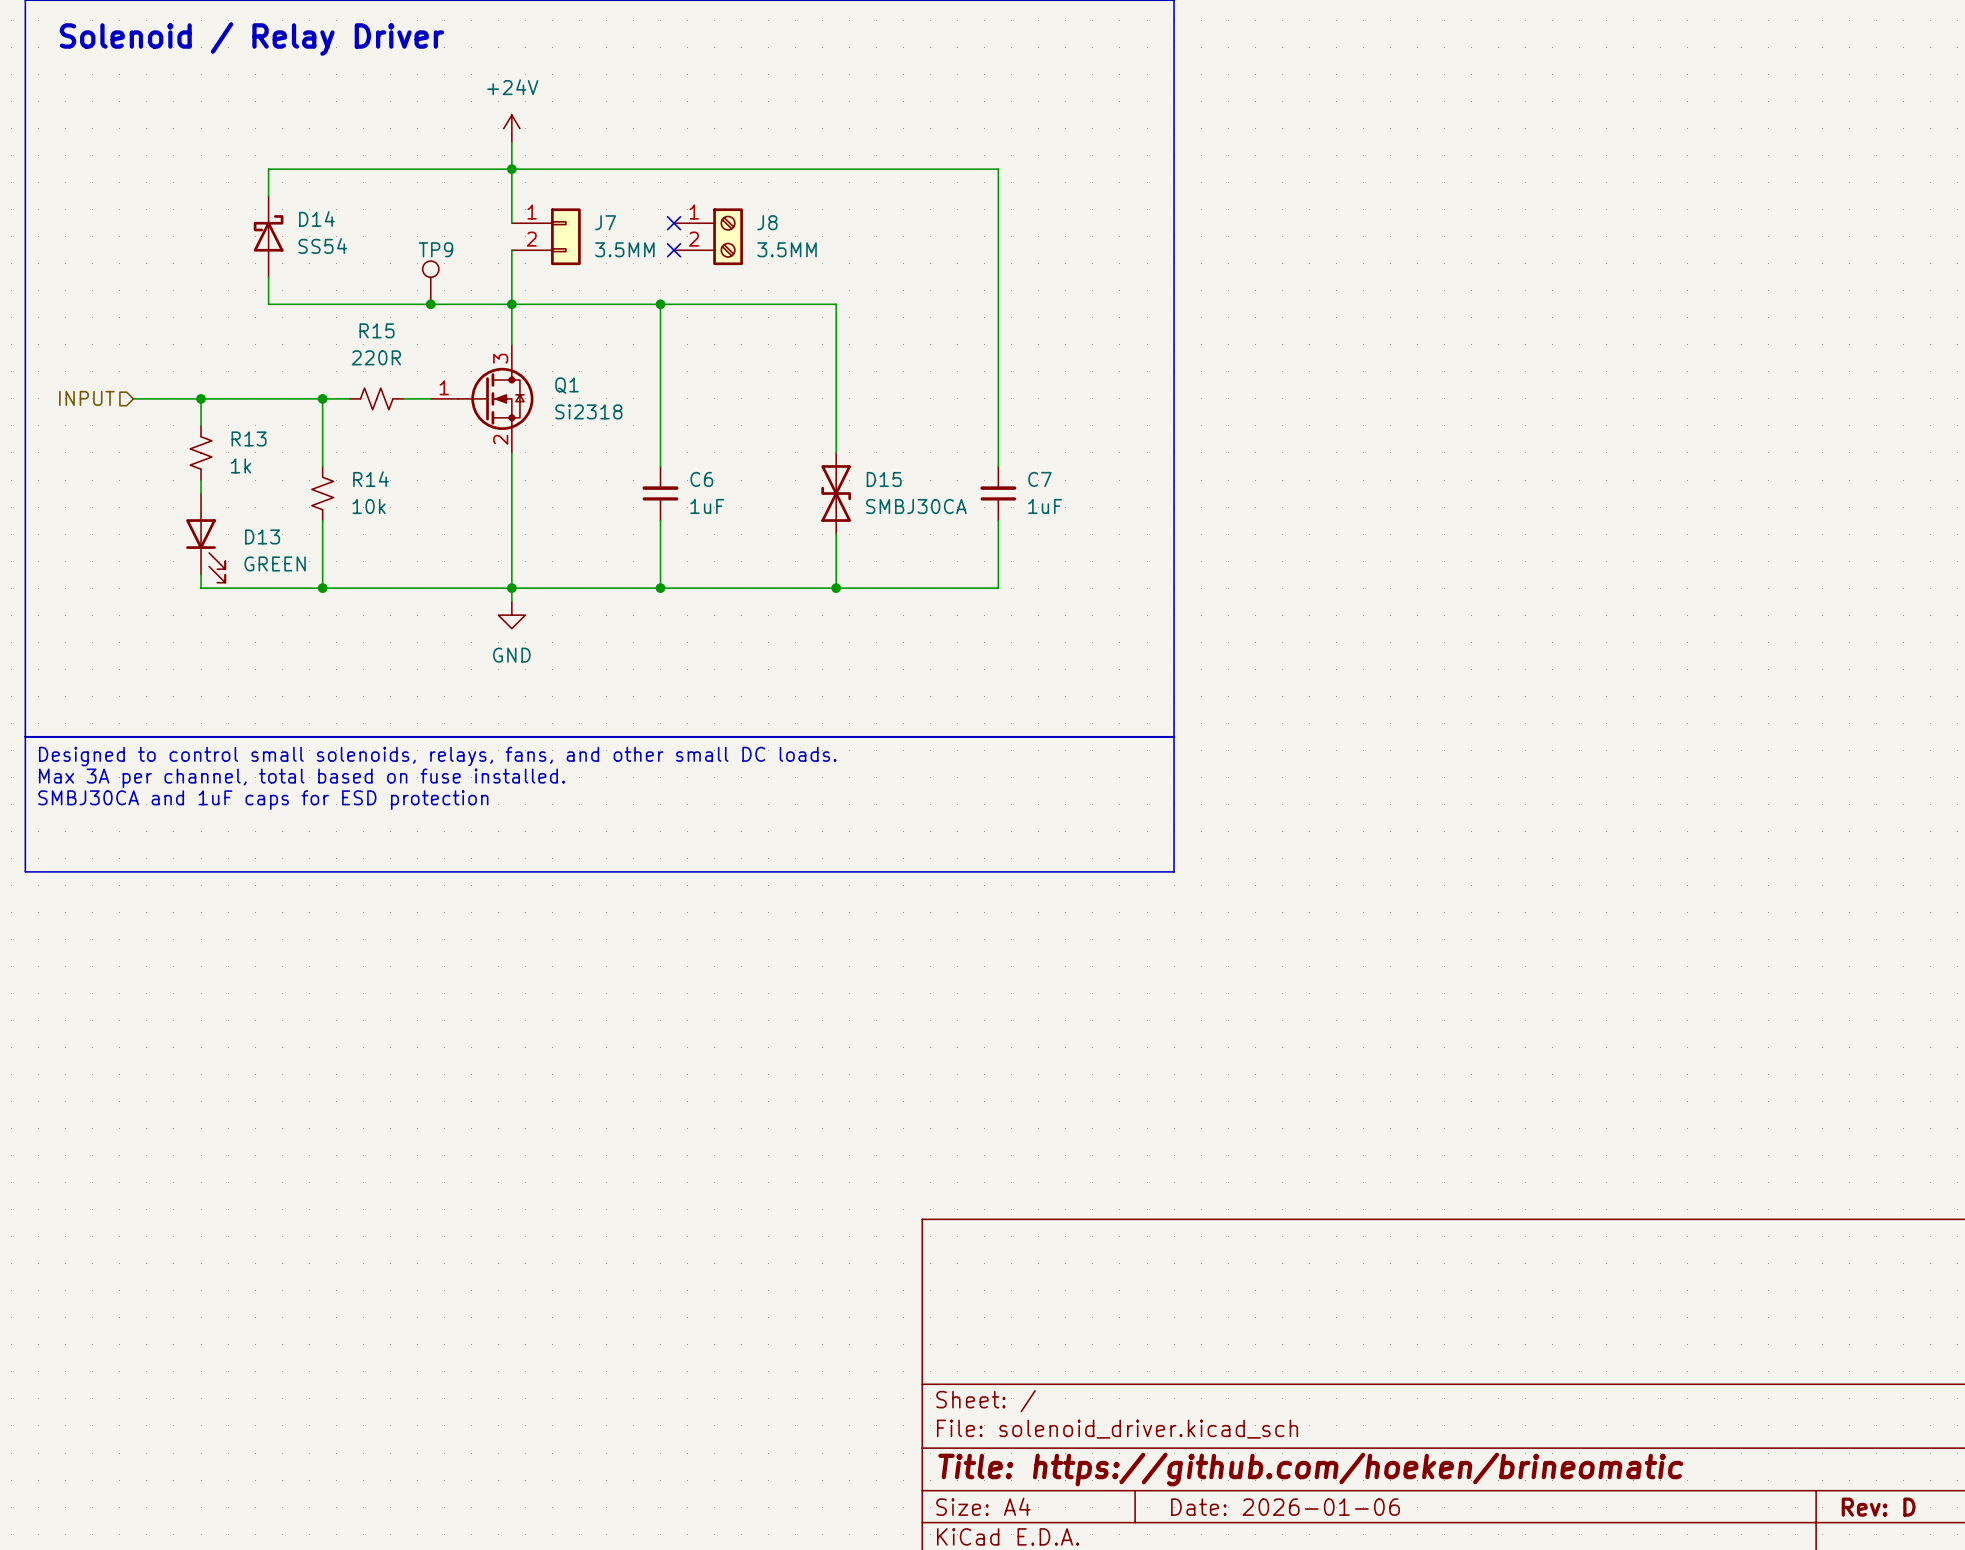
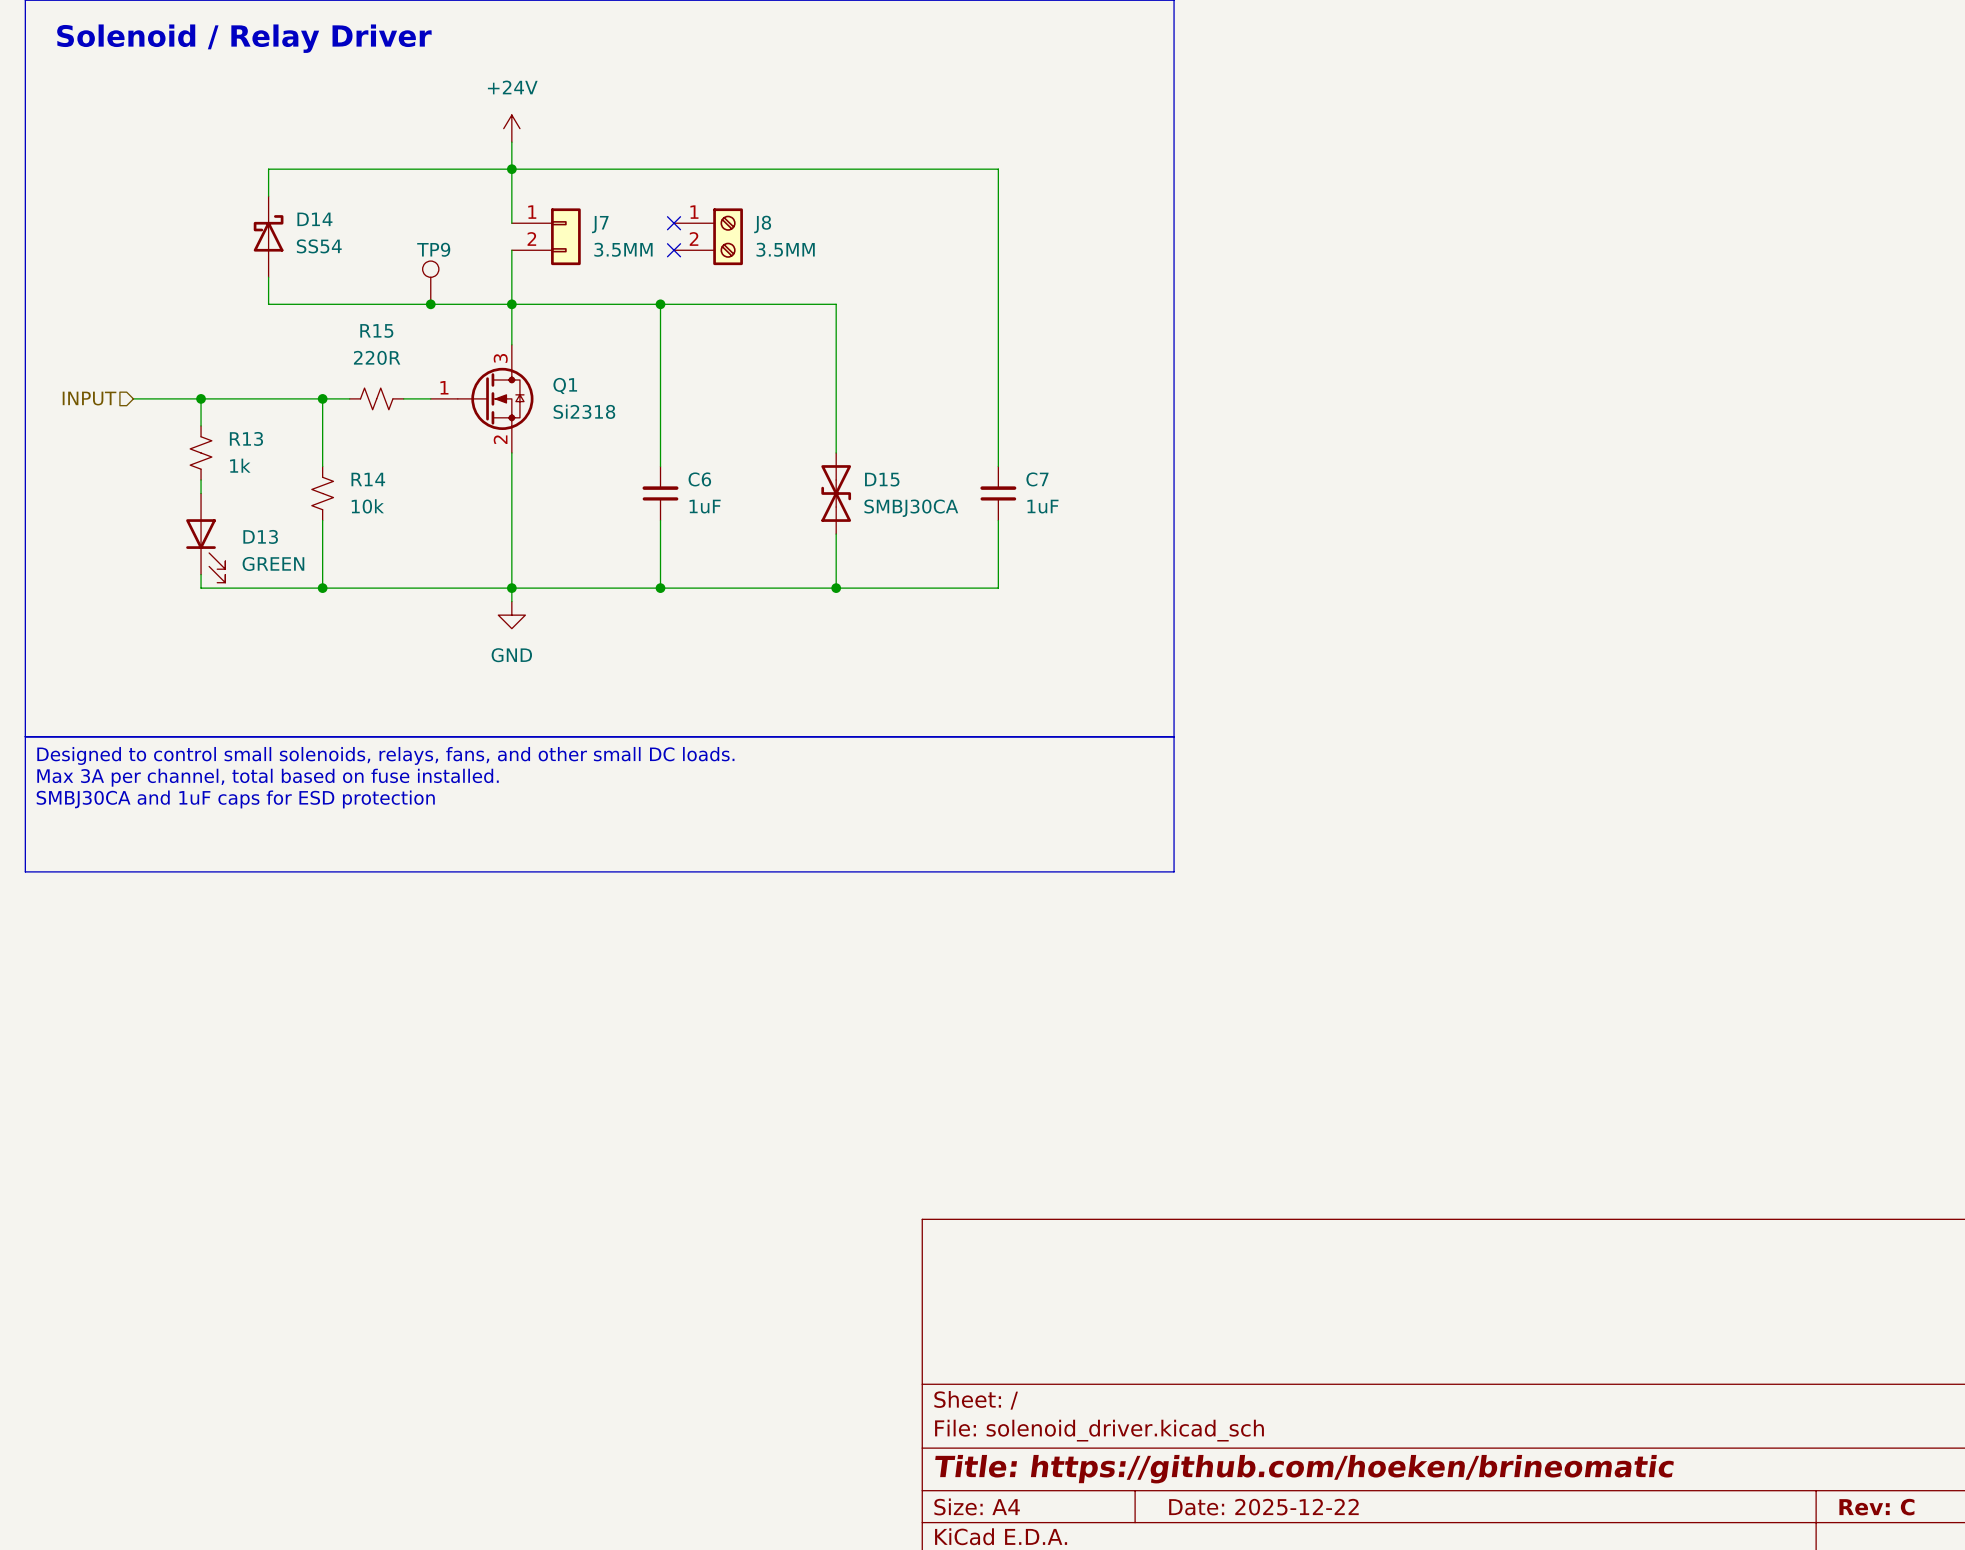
title block: Date: 2026-01-06 (1285, 1507) -> Date: 2025-12-22 (1263, 1507)
title block: Rev: D (1878, 1507) -> Rev: C (1876, 1507)

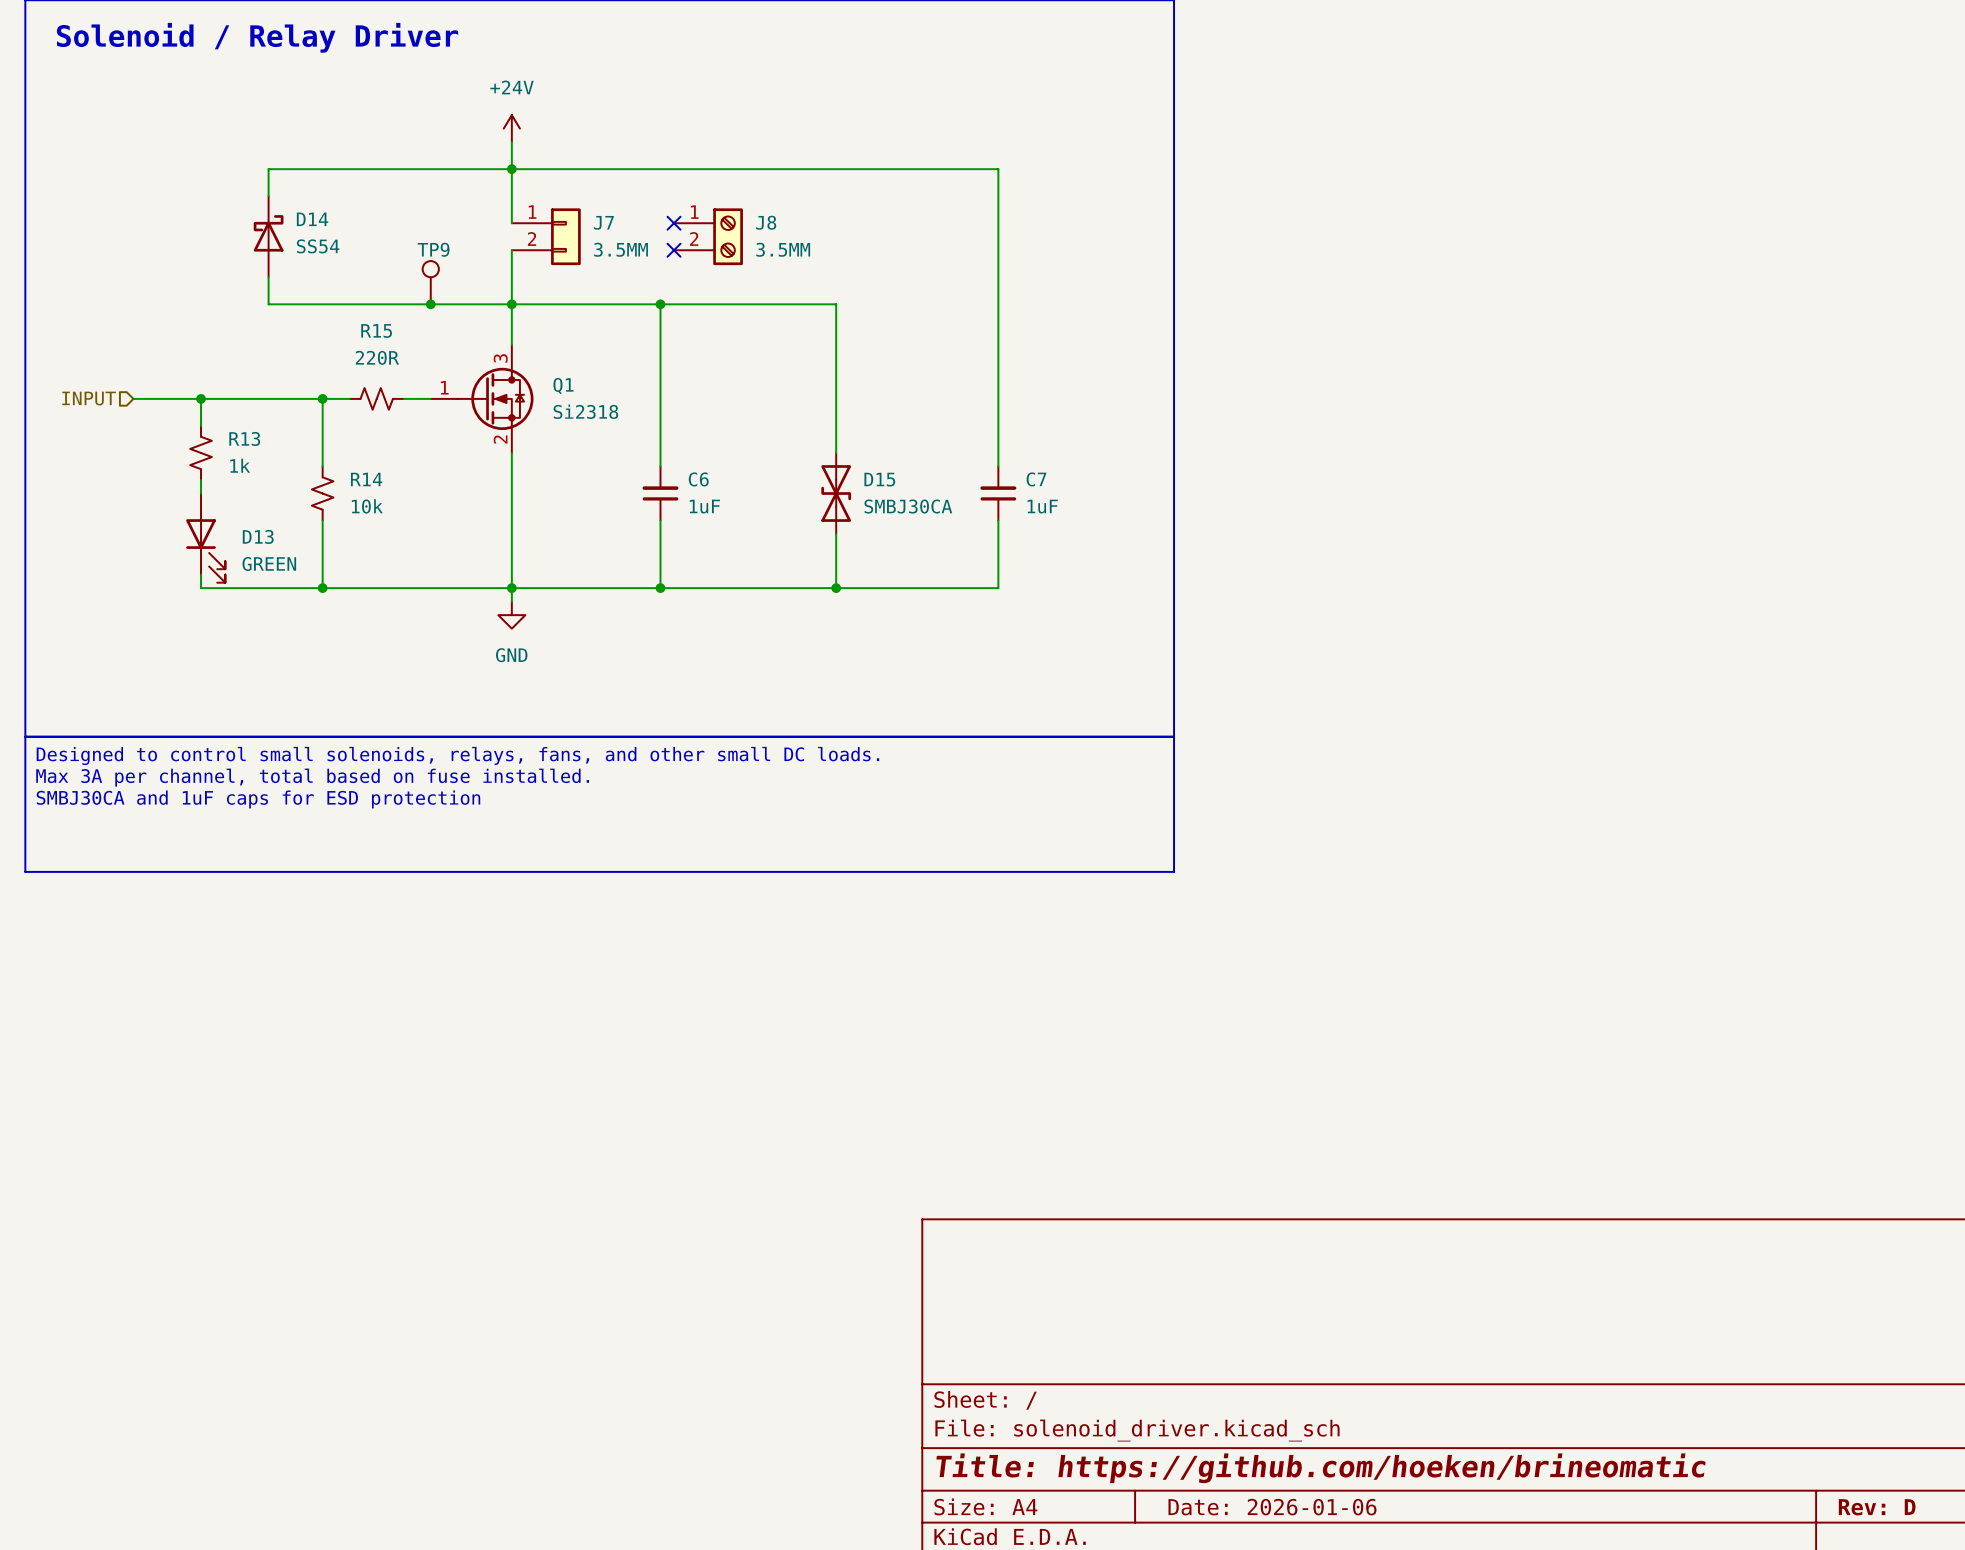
title block: Date: 2025-12-22 (1263, 1507) -> Date: 2026-01-06 (1272, 1507)
title block: Rev: C (1876, 1507) -> Rev: D (1877, 1507)

